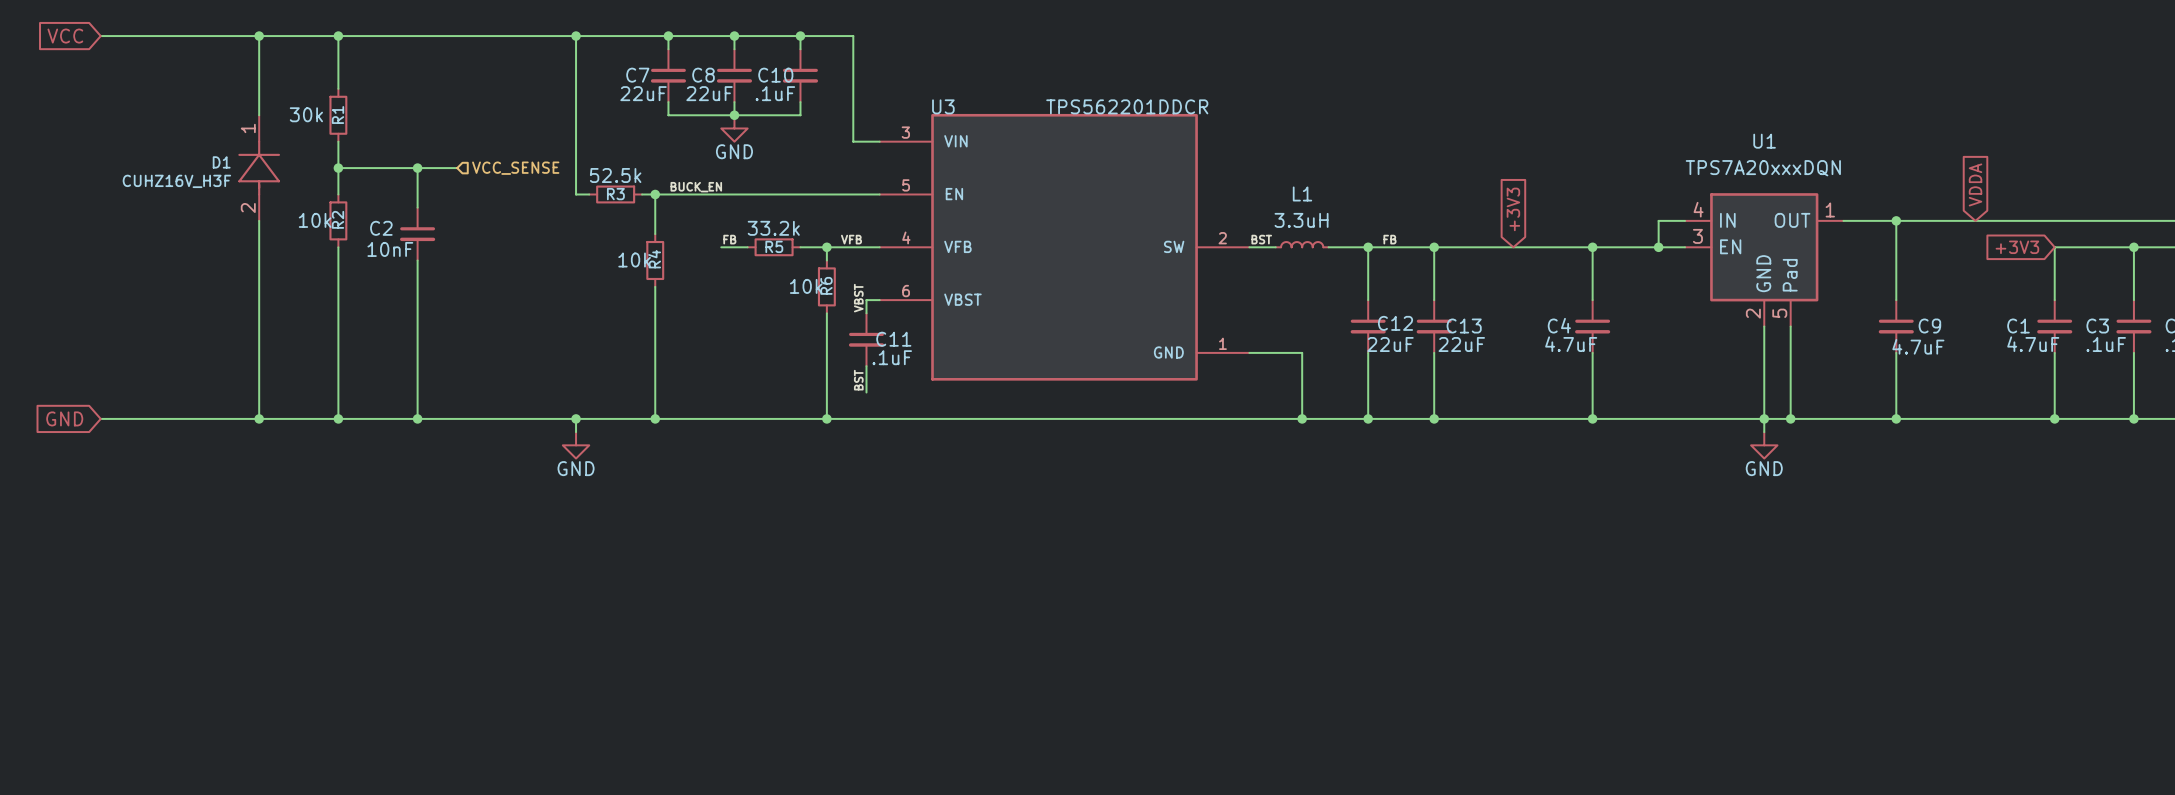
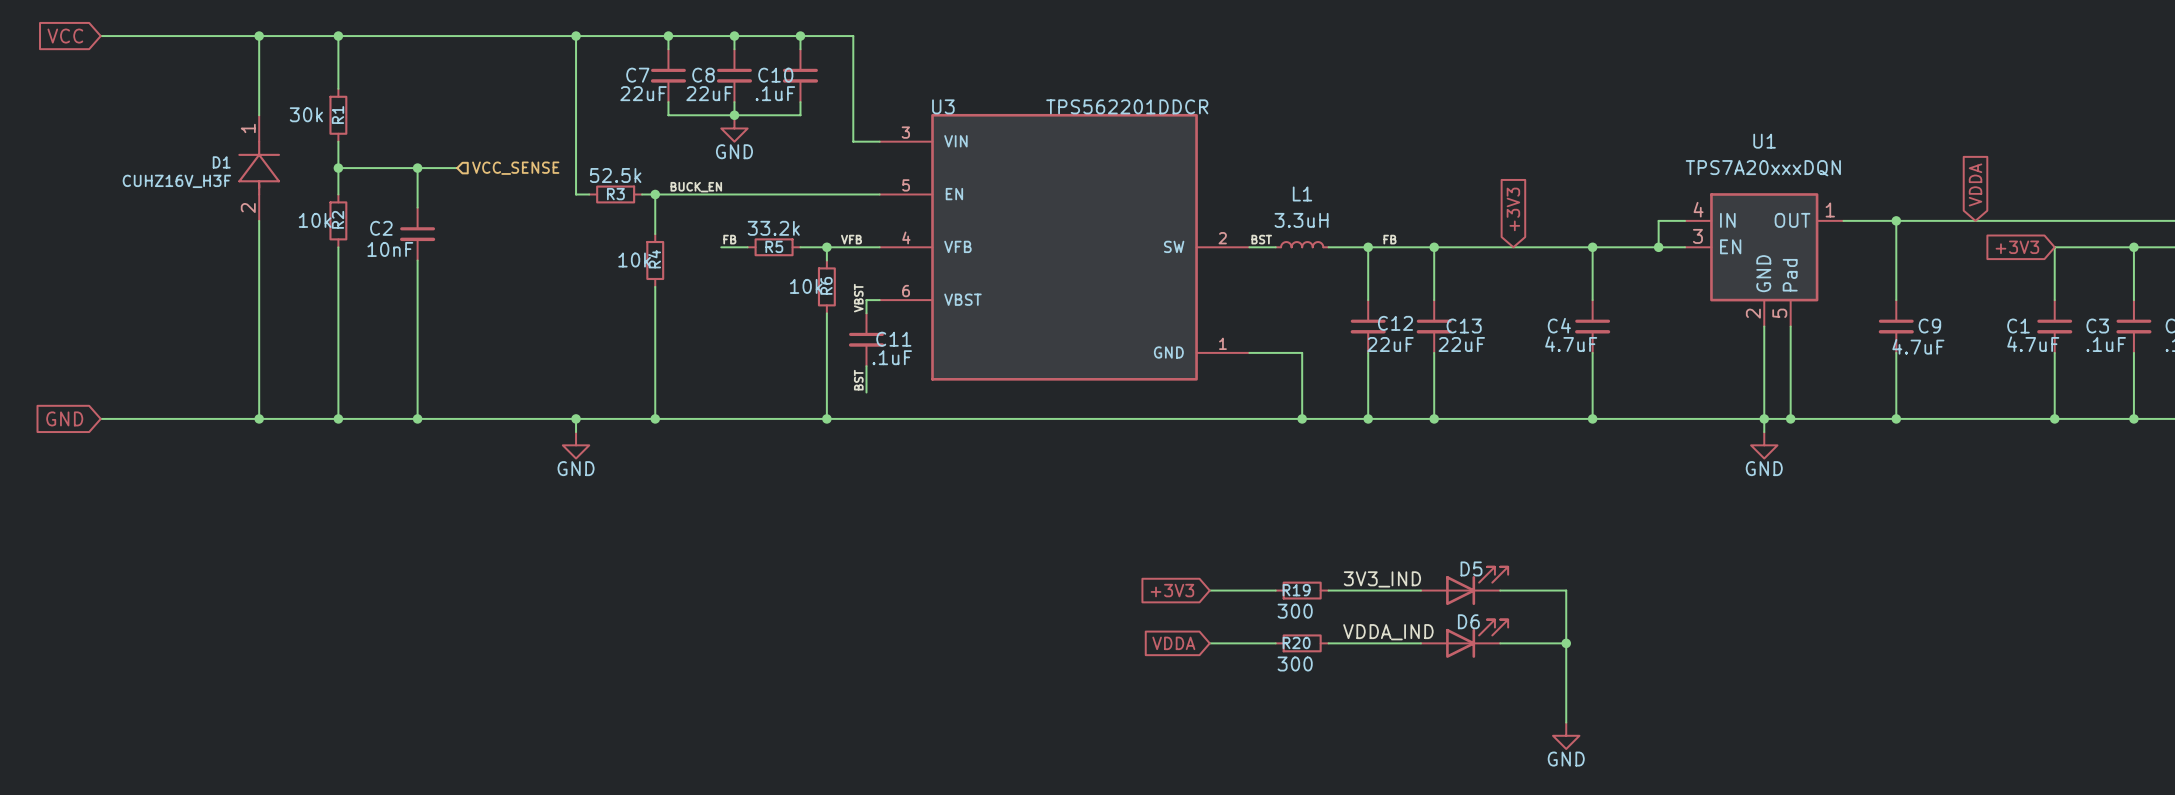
label: none -> 3V3_IND (1382, 579)
D5: none -> (1464, 585)
global label: none -> +3V3 (1172, 590)
wire: none -> (1209, 590) (1275, 590)
R19: none -> 300 (1302, 590)
wire: none -> (1328, 590) (1421, 590)
wire: none -> (1500, 590) (1566, 590) (1566, 722)
label: none -> VDDA_IND (1388, 632)
D6: none -> (1464, 638)
global label: none -> VDDA (1173, 643)
wire: none -> (1209, 643) (1275, 643)
R20: none -> 300 (1302, 643)
wire: none -> (1328, 643) (1421, 643)
wire: none -> (1500, 643) (1566, 643)
junction: none -> (1566, 643)
power symbol: none -> GND (1566, 735)

